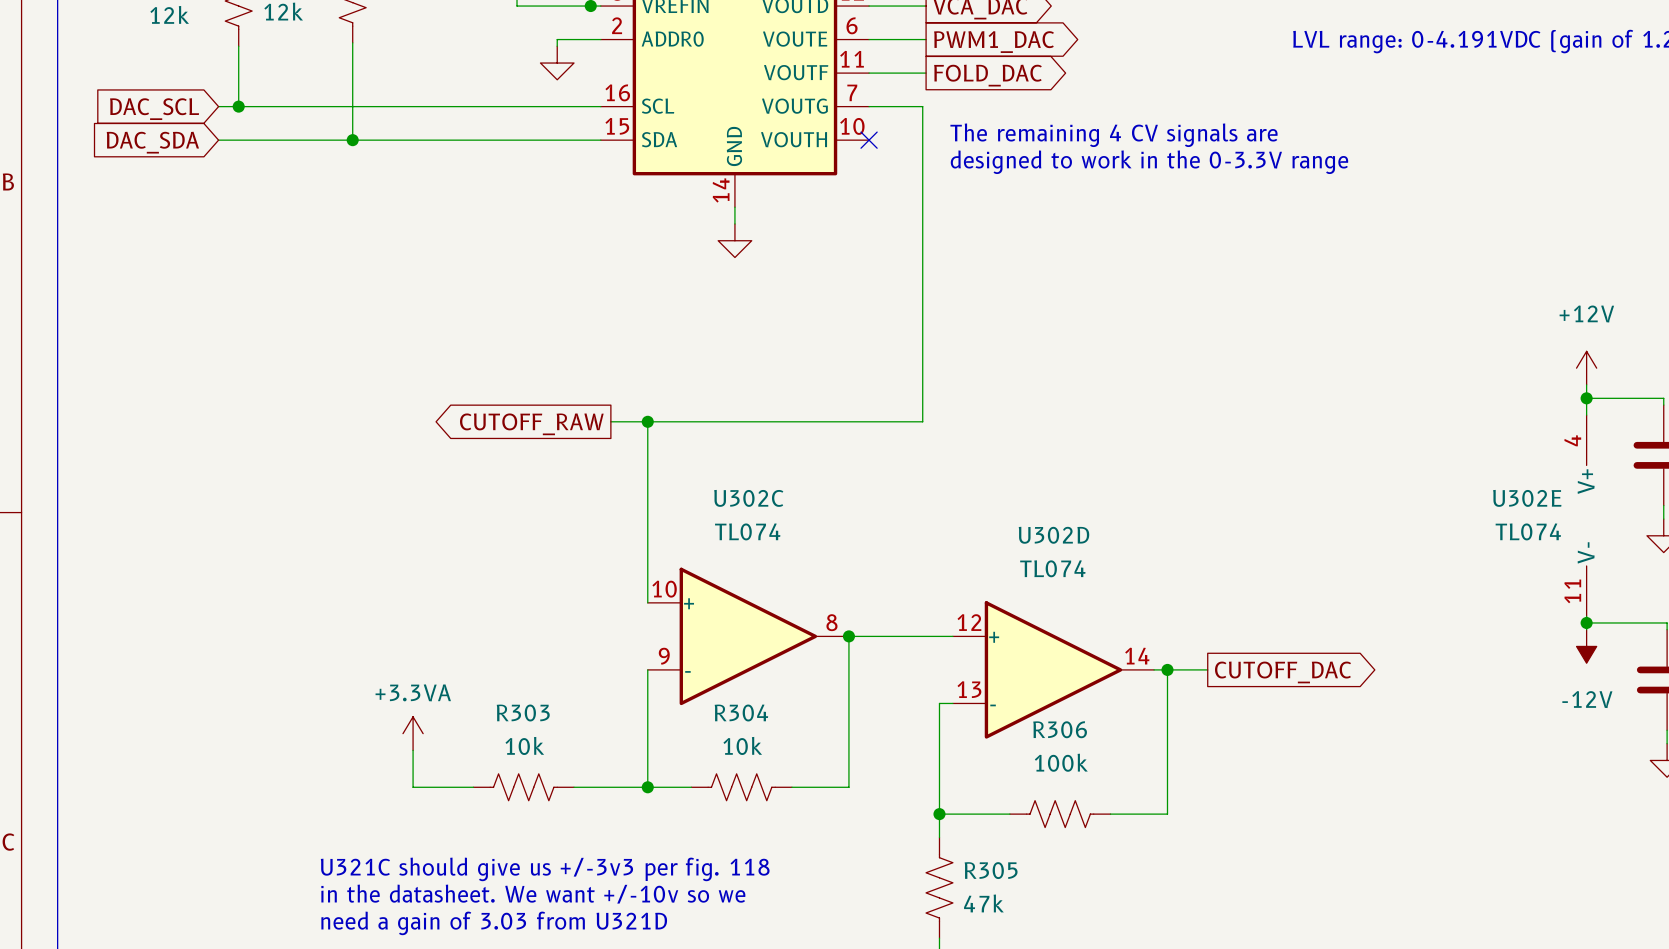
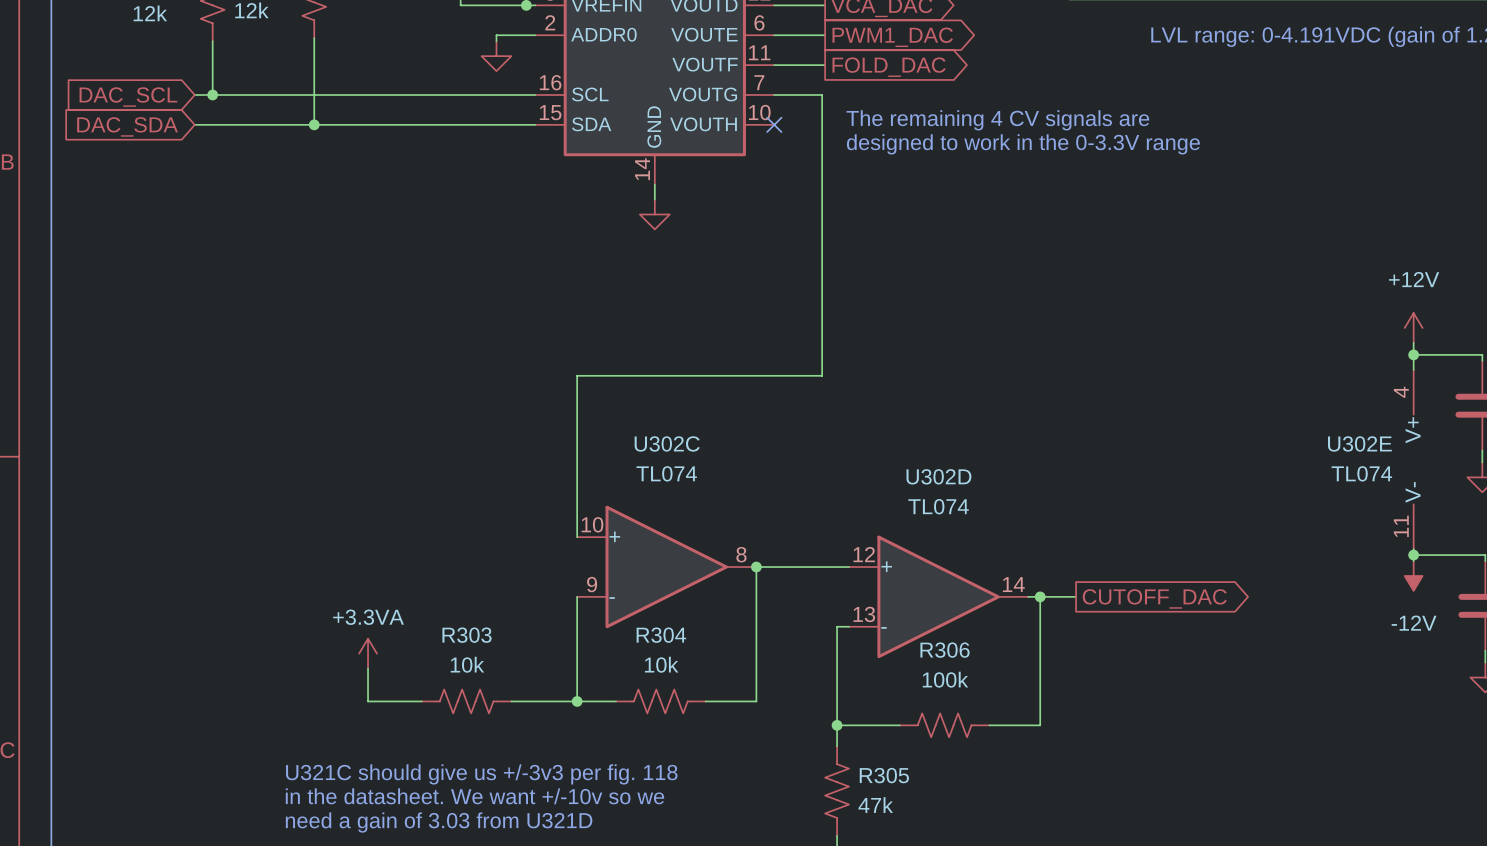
wire: (610, 421) (647, 421) -> none
junction: (647, 421) -> none
global label: CUTOFF_RAW (531, 424) -> none

